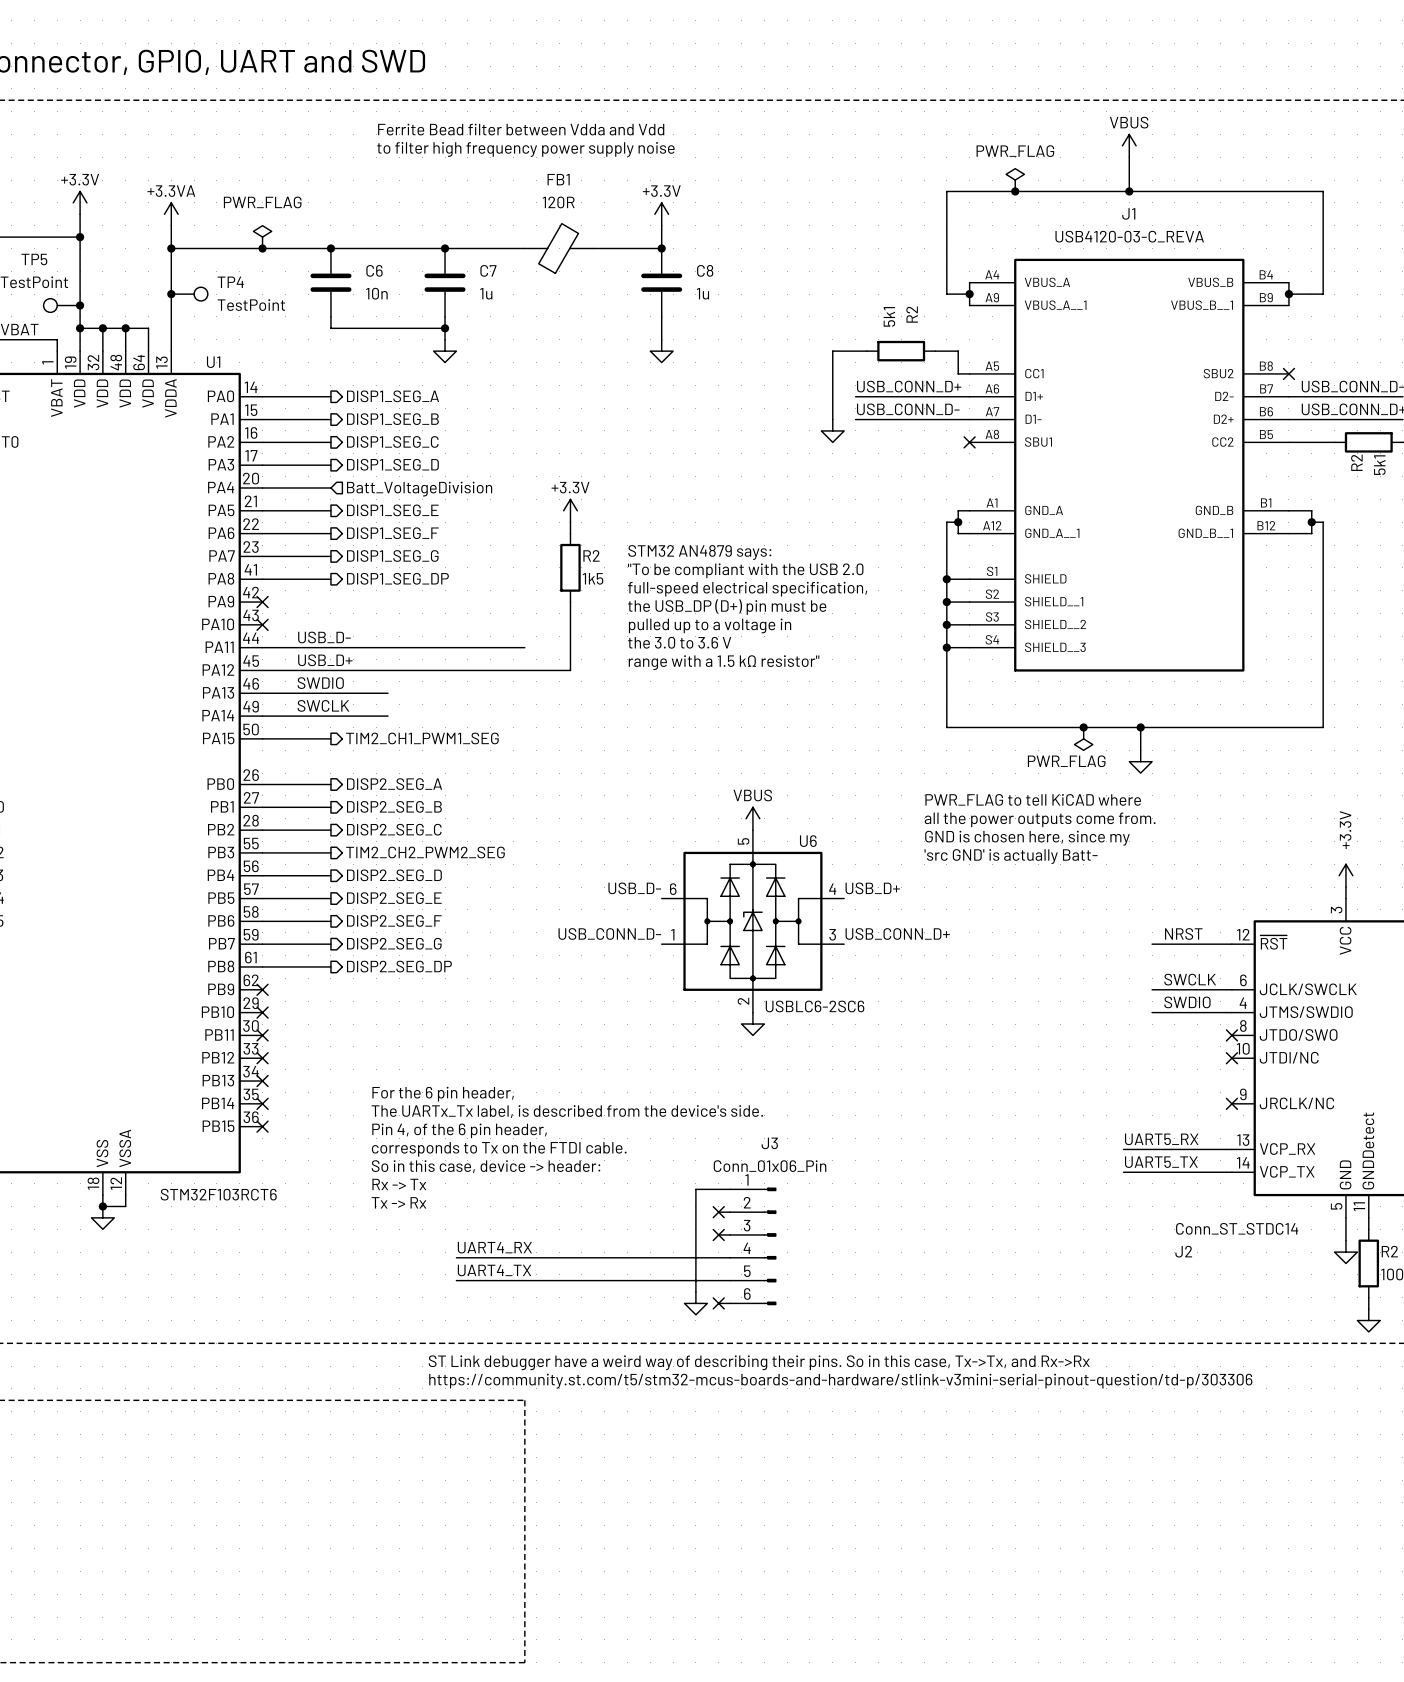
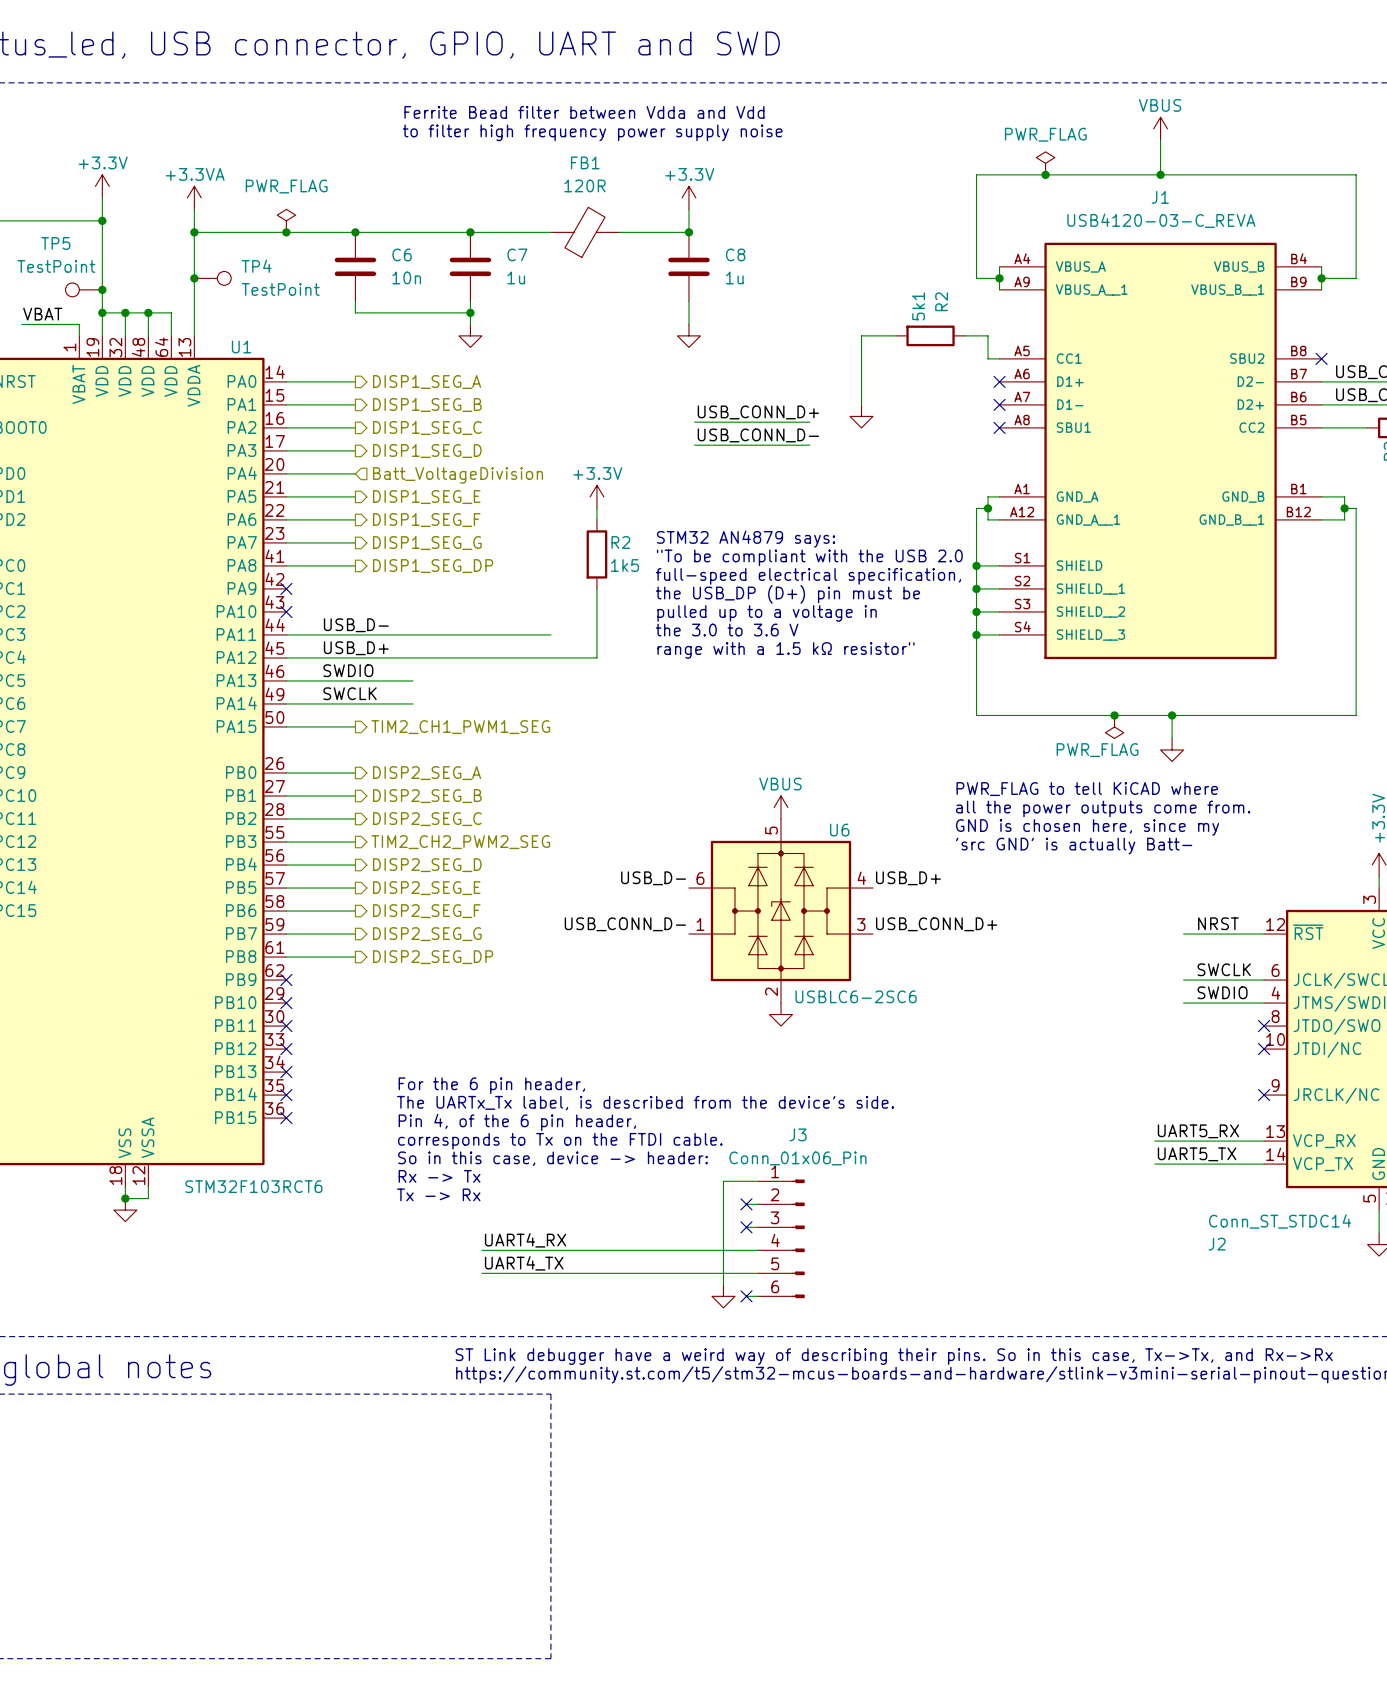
label position: USB_CONN_D+ (909, 386) -> USB_CONN_D+ (758, 412)
wire: (855, 396) (969, 396) -> (694, 445) (809, 445)
no-connect mark: none -> (999, 381)
label position: USB_CONN_D- (908, 409) -> USB_CONN_D- (758, 435)
wire: (855, 419) (969, 419) -> (694, 422) (809, 422)
no-connect mark: none -> (999, 404)

